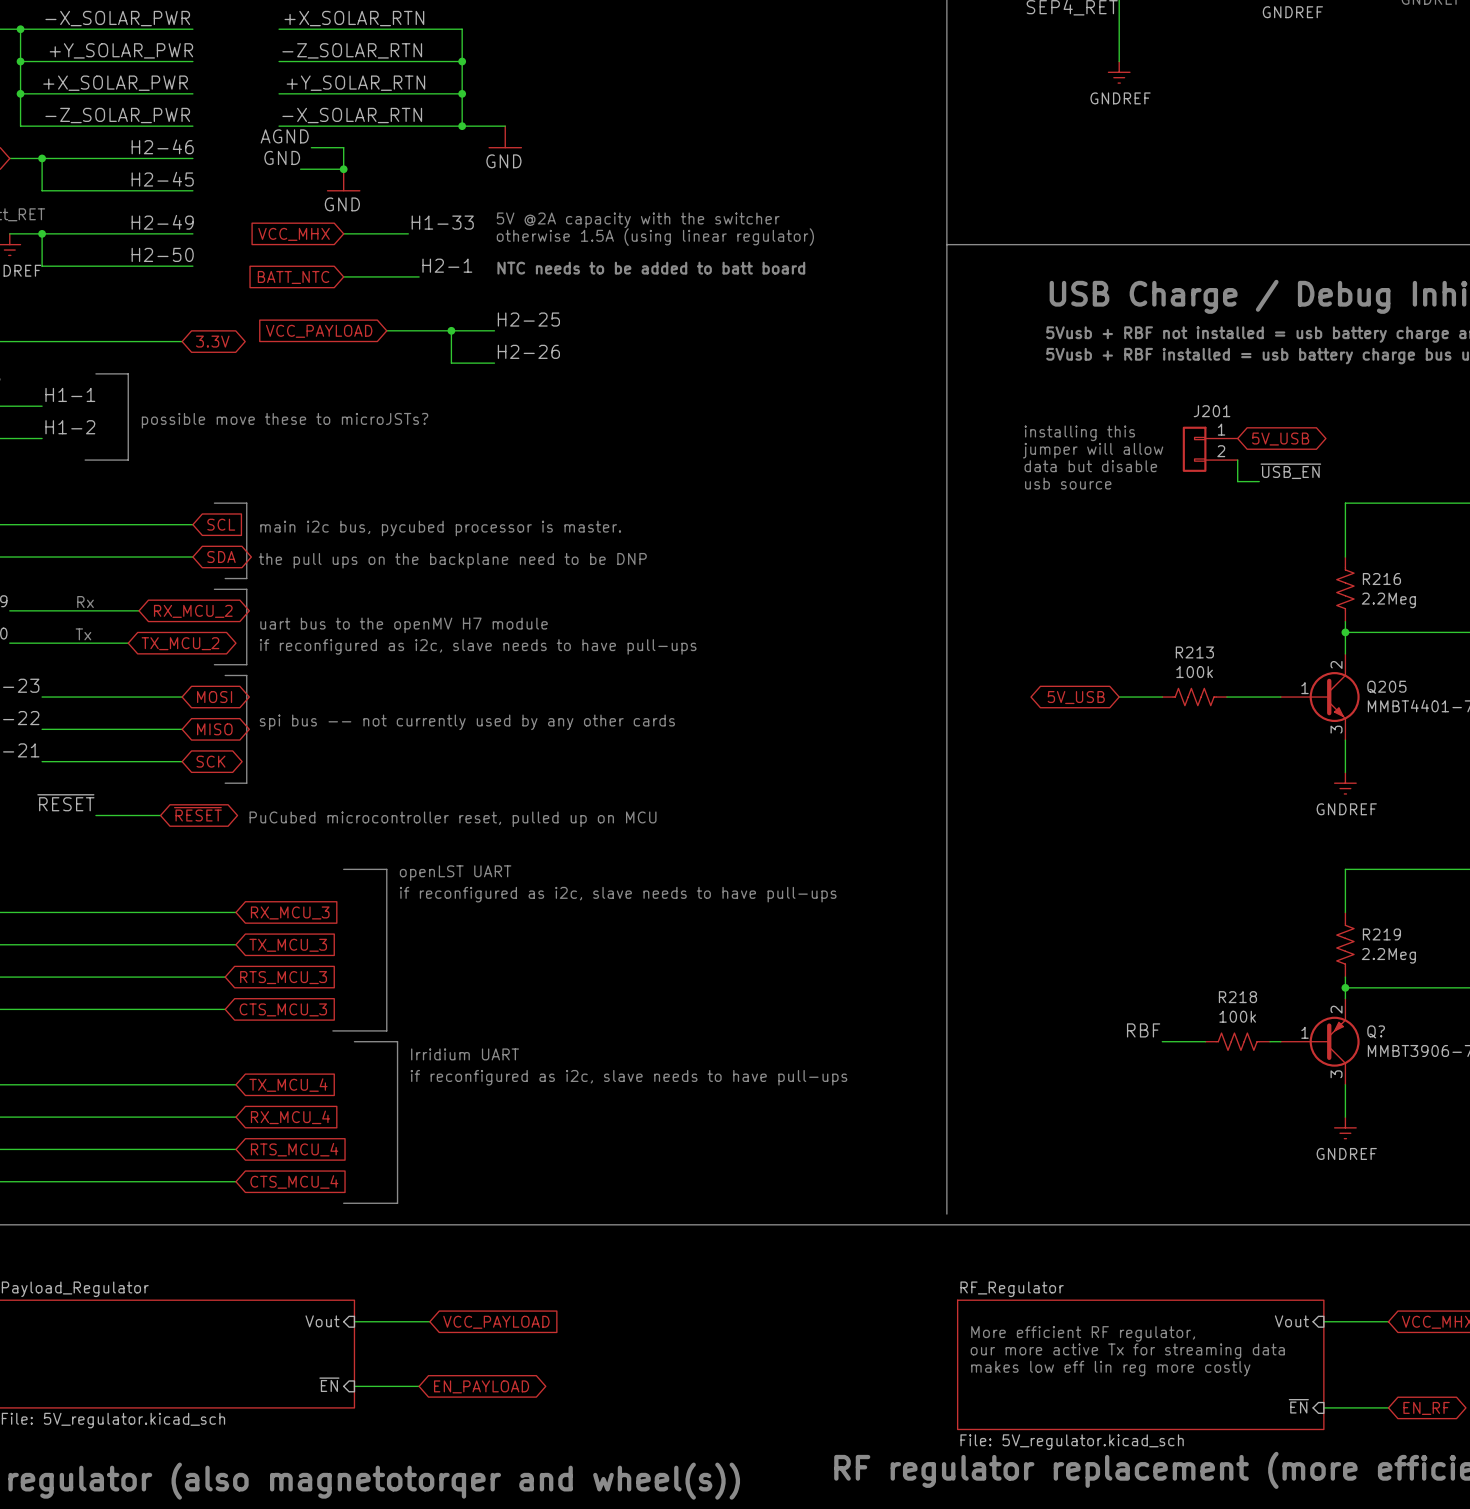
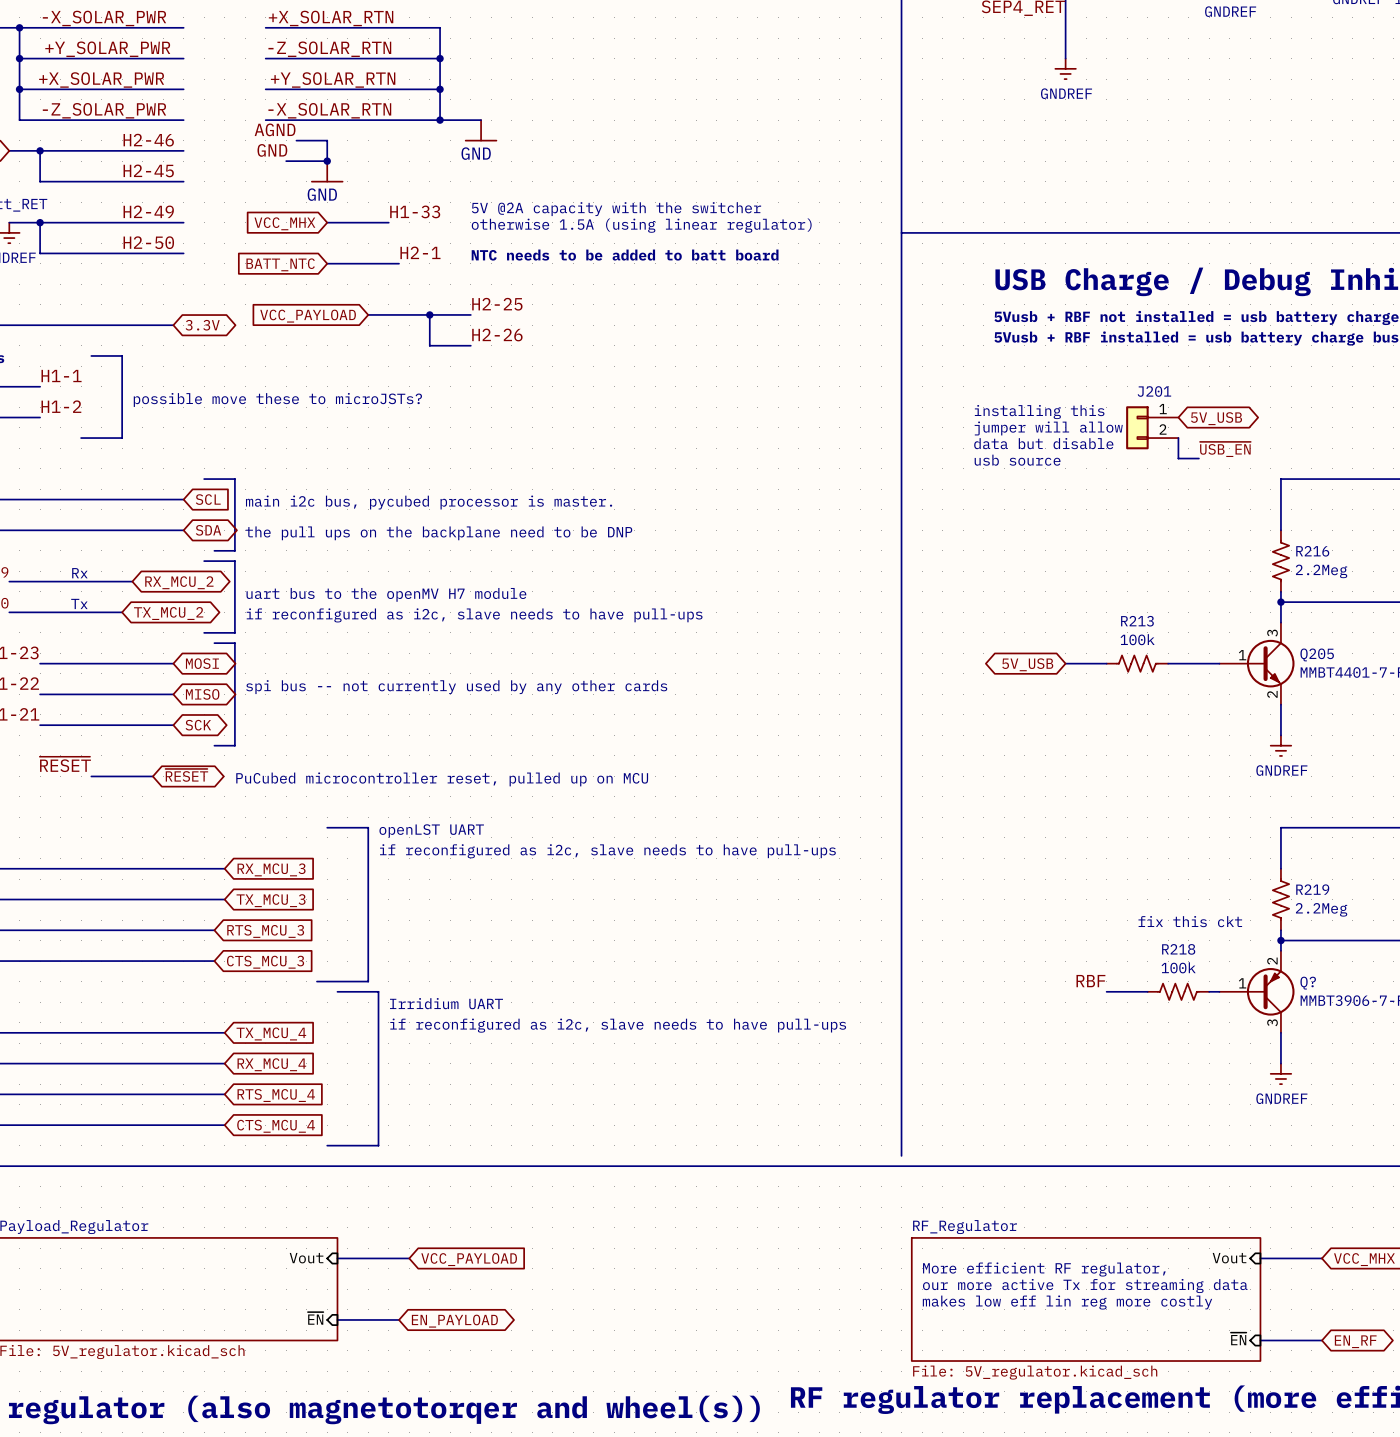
Q205 pin number: 2 (1336, 664) -> 3 (1272, 633)
Q205 pin number: 3 (1336, 729) -> 2 (1272, 694)
text: none -> fix this ckt (1190, 921)

